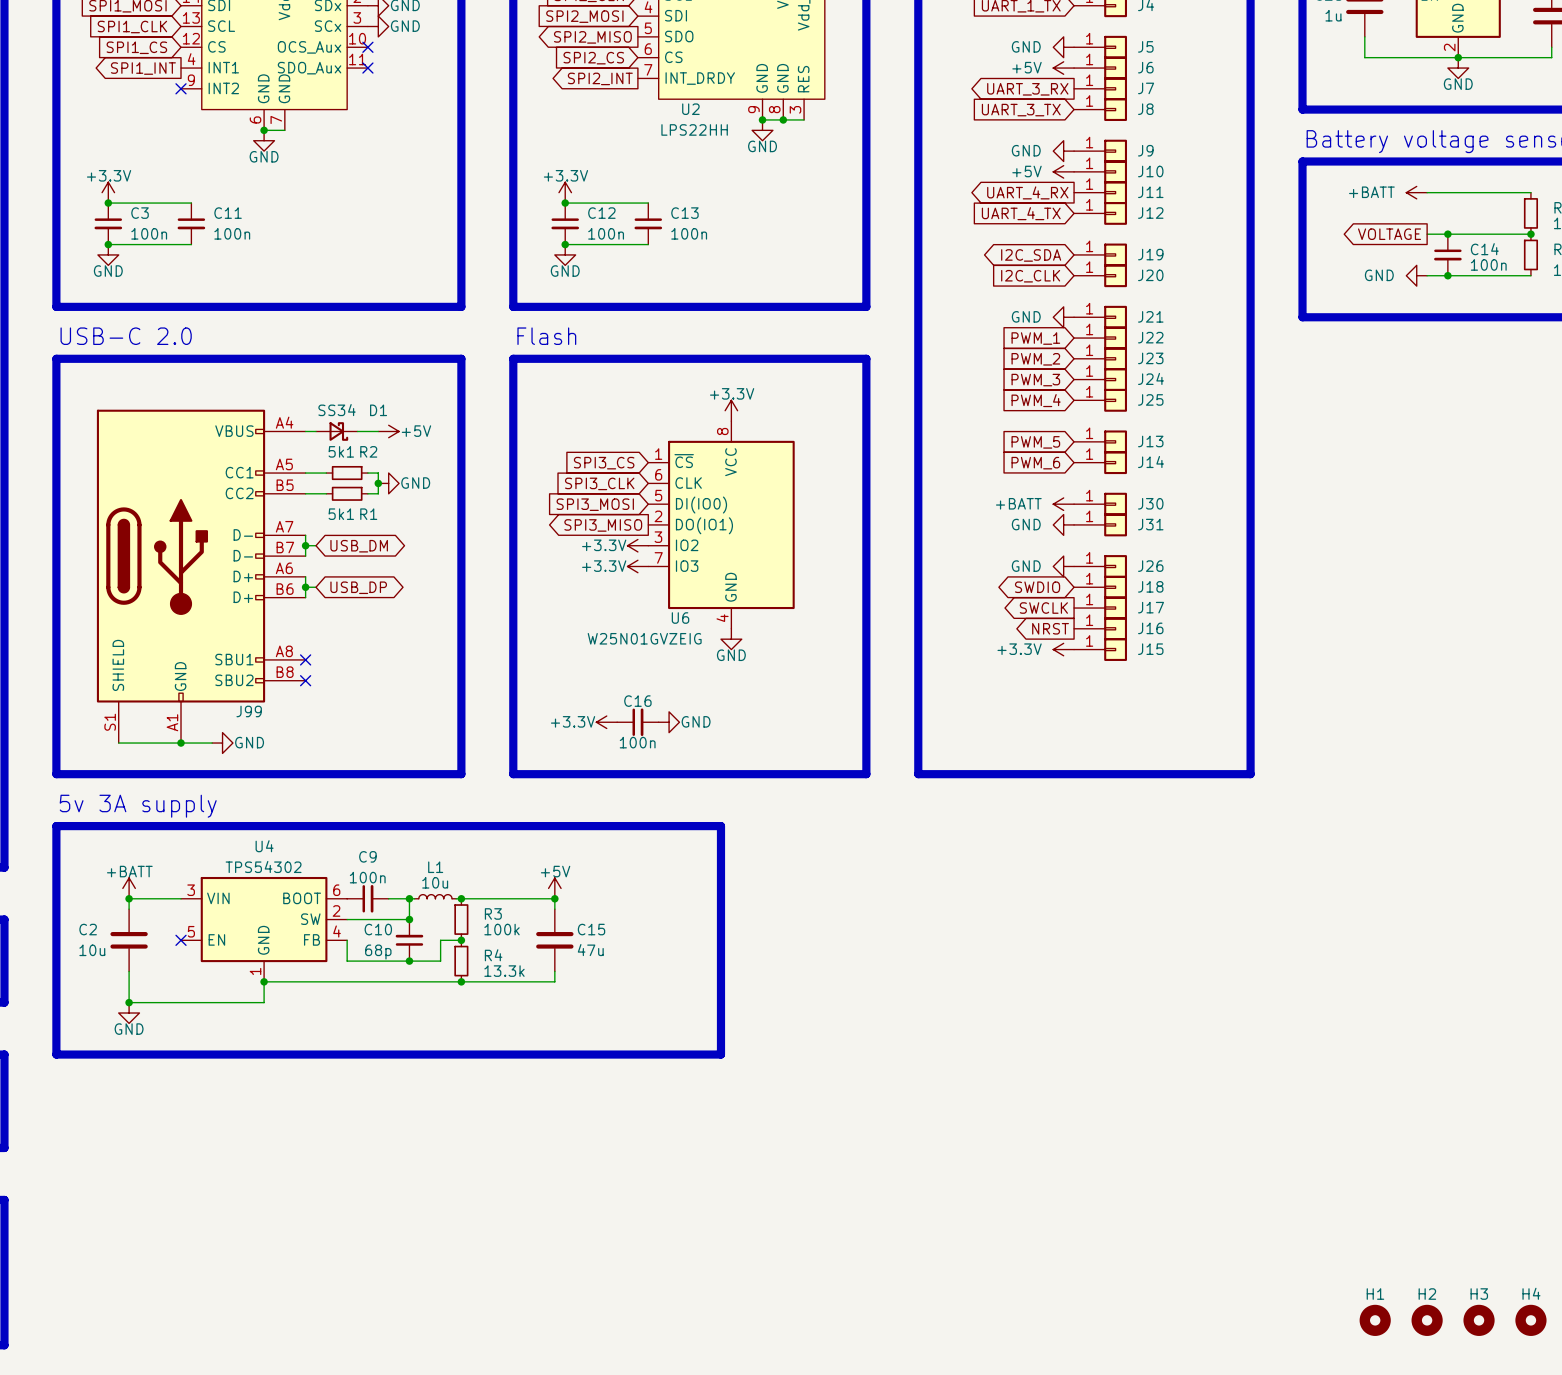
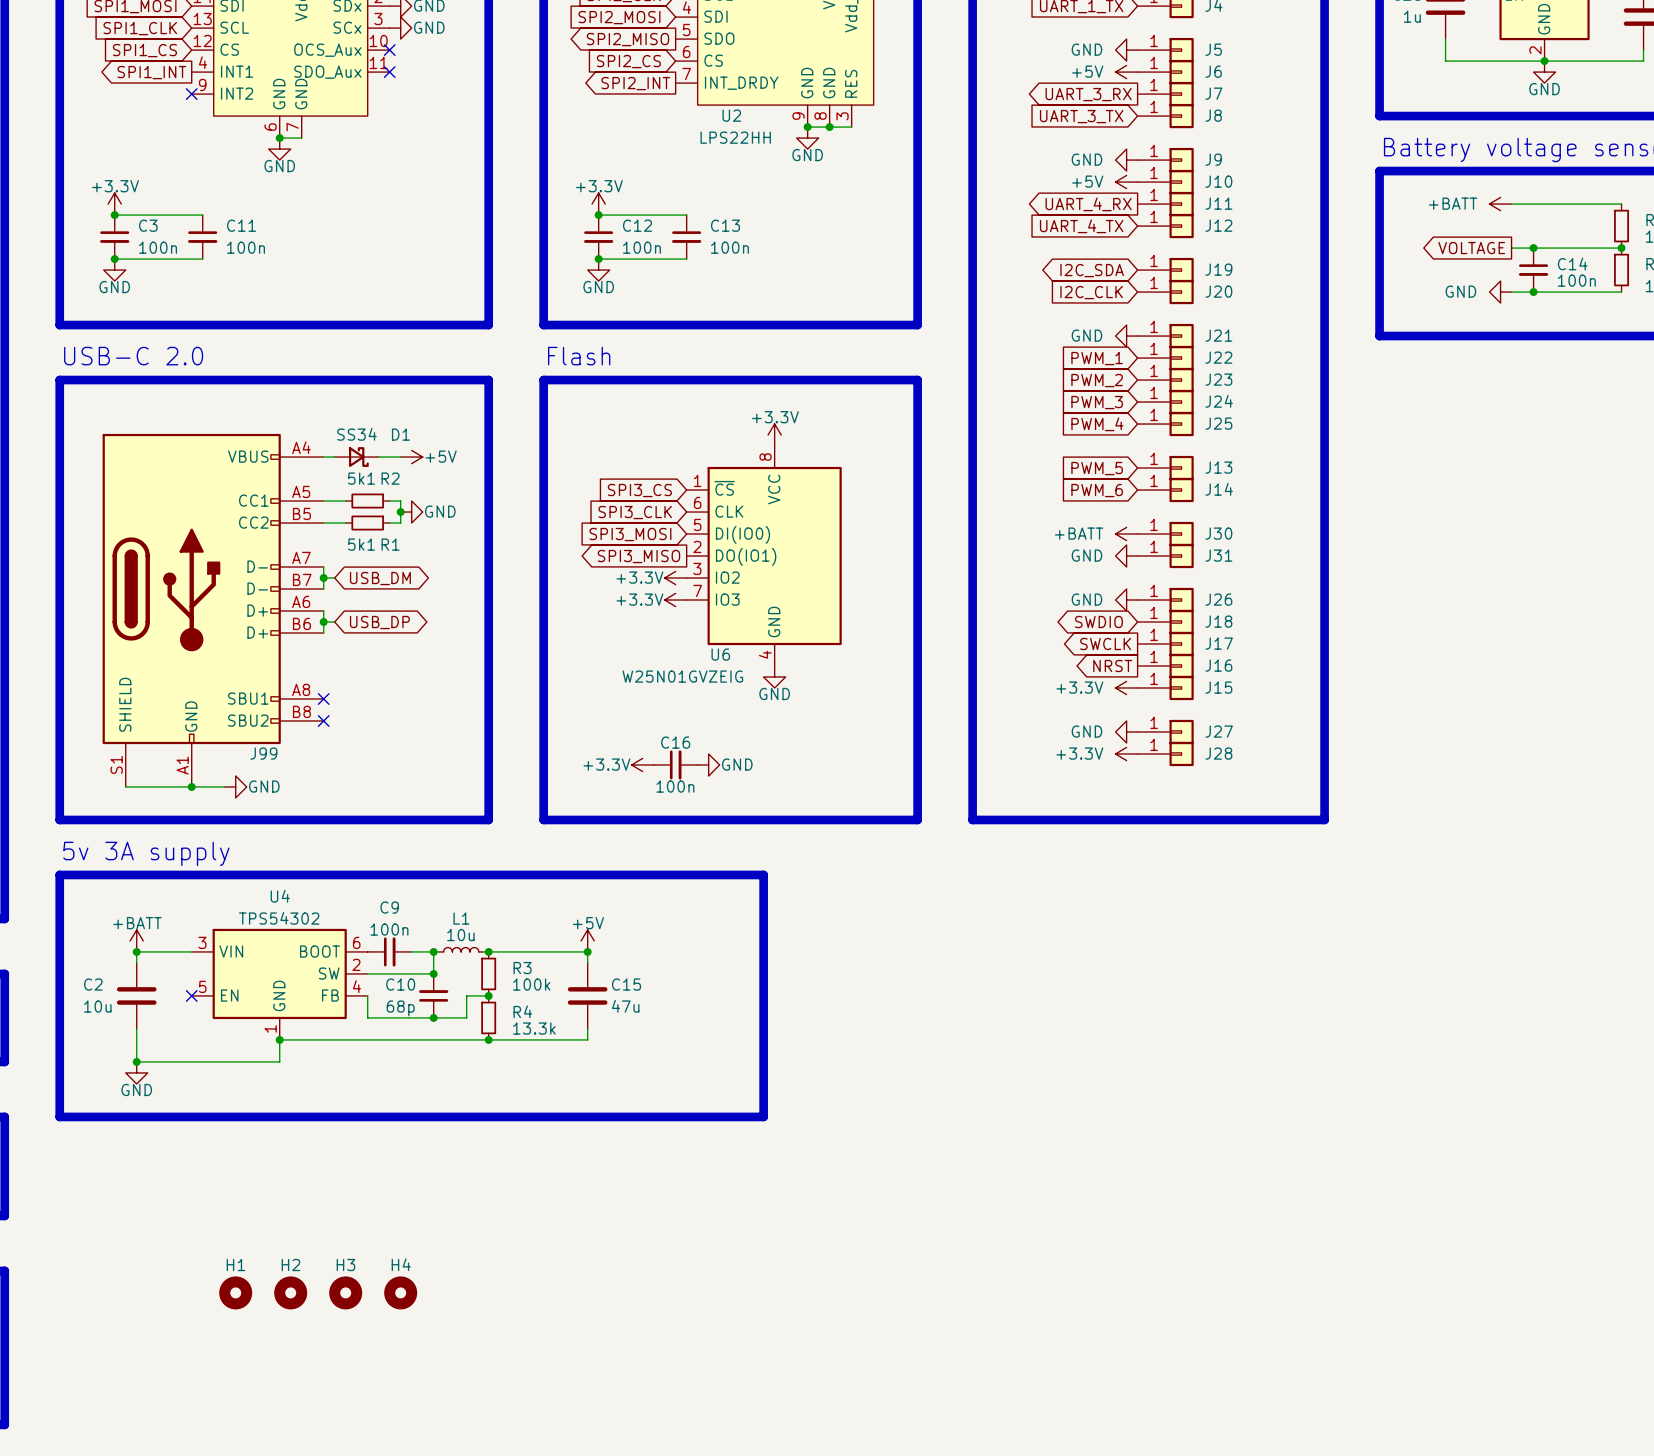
power symbol: none -> GND (1126, 731)
J27: none -> (1165, 731)
power symbol: none -> +3.3V (1126, 753)
J28: none -> (1165, 753)
H1 position: (1375, 1320) -> (235, 1292)
H2 position: (1427, 1320) -> (290, 1292)
H3 position: (1479, 1320) -> (345, 1292)
H4 position: (1530, 1320) -> (400, 1292)

